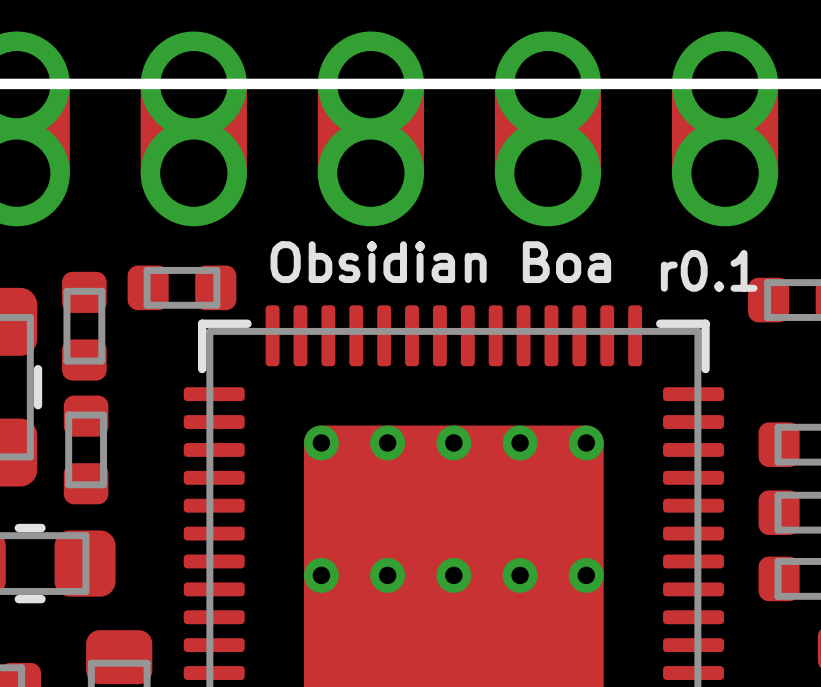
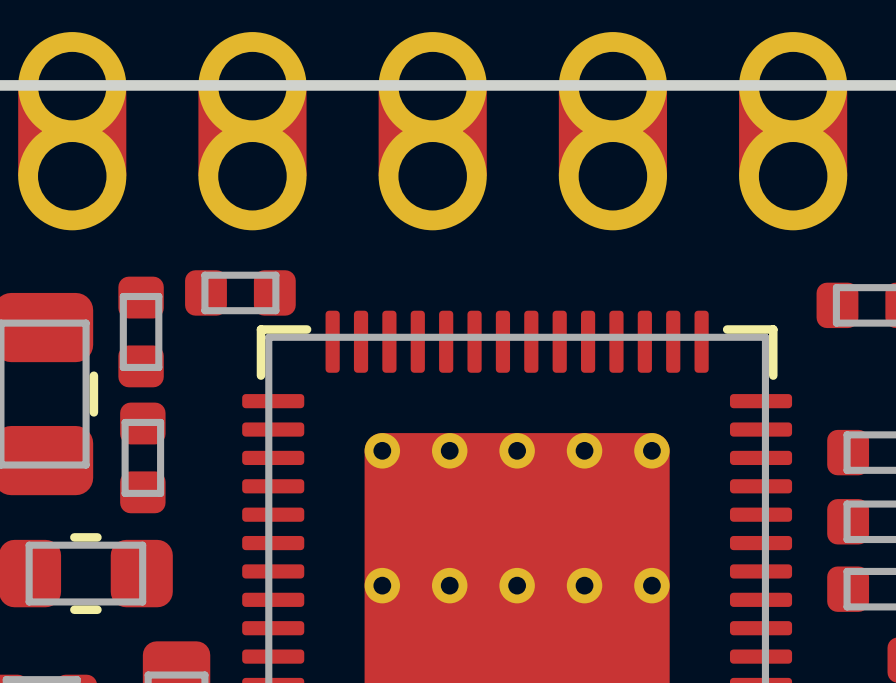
text: Obsidian Boa (440, 262) -> none
text: r0.1 (709, 270) -> none

